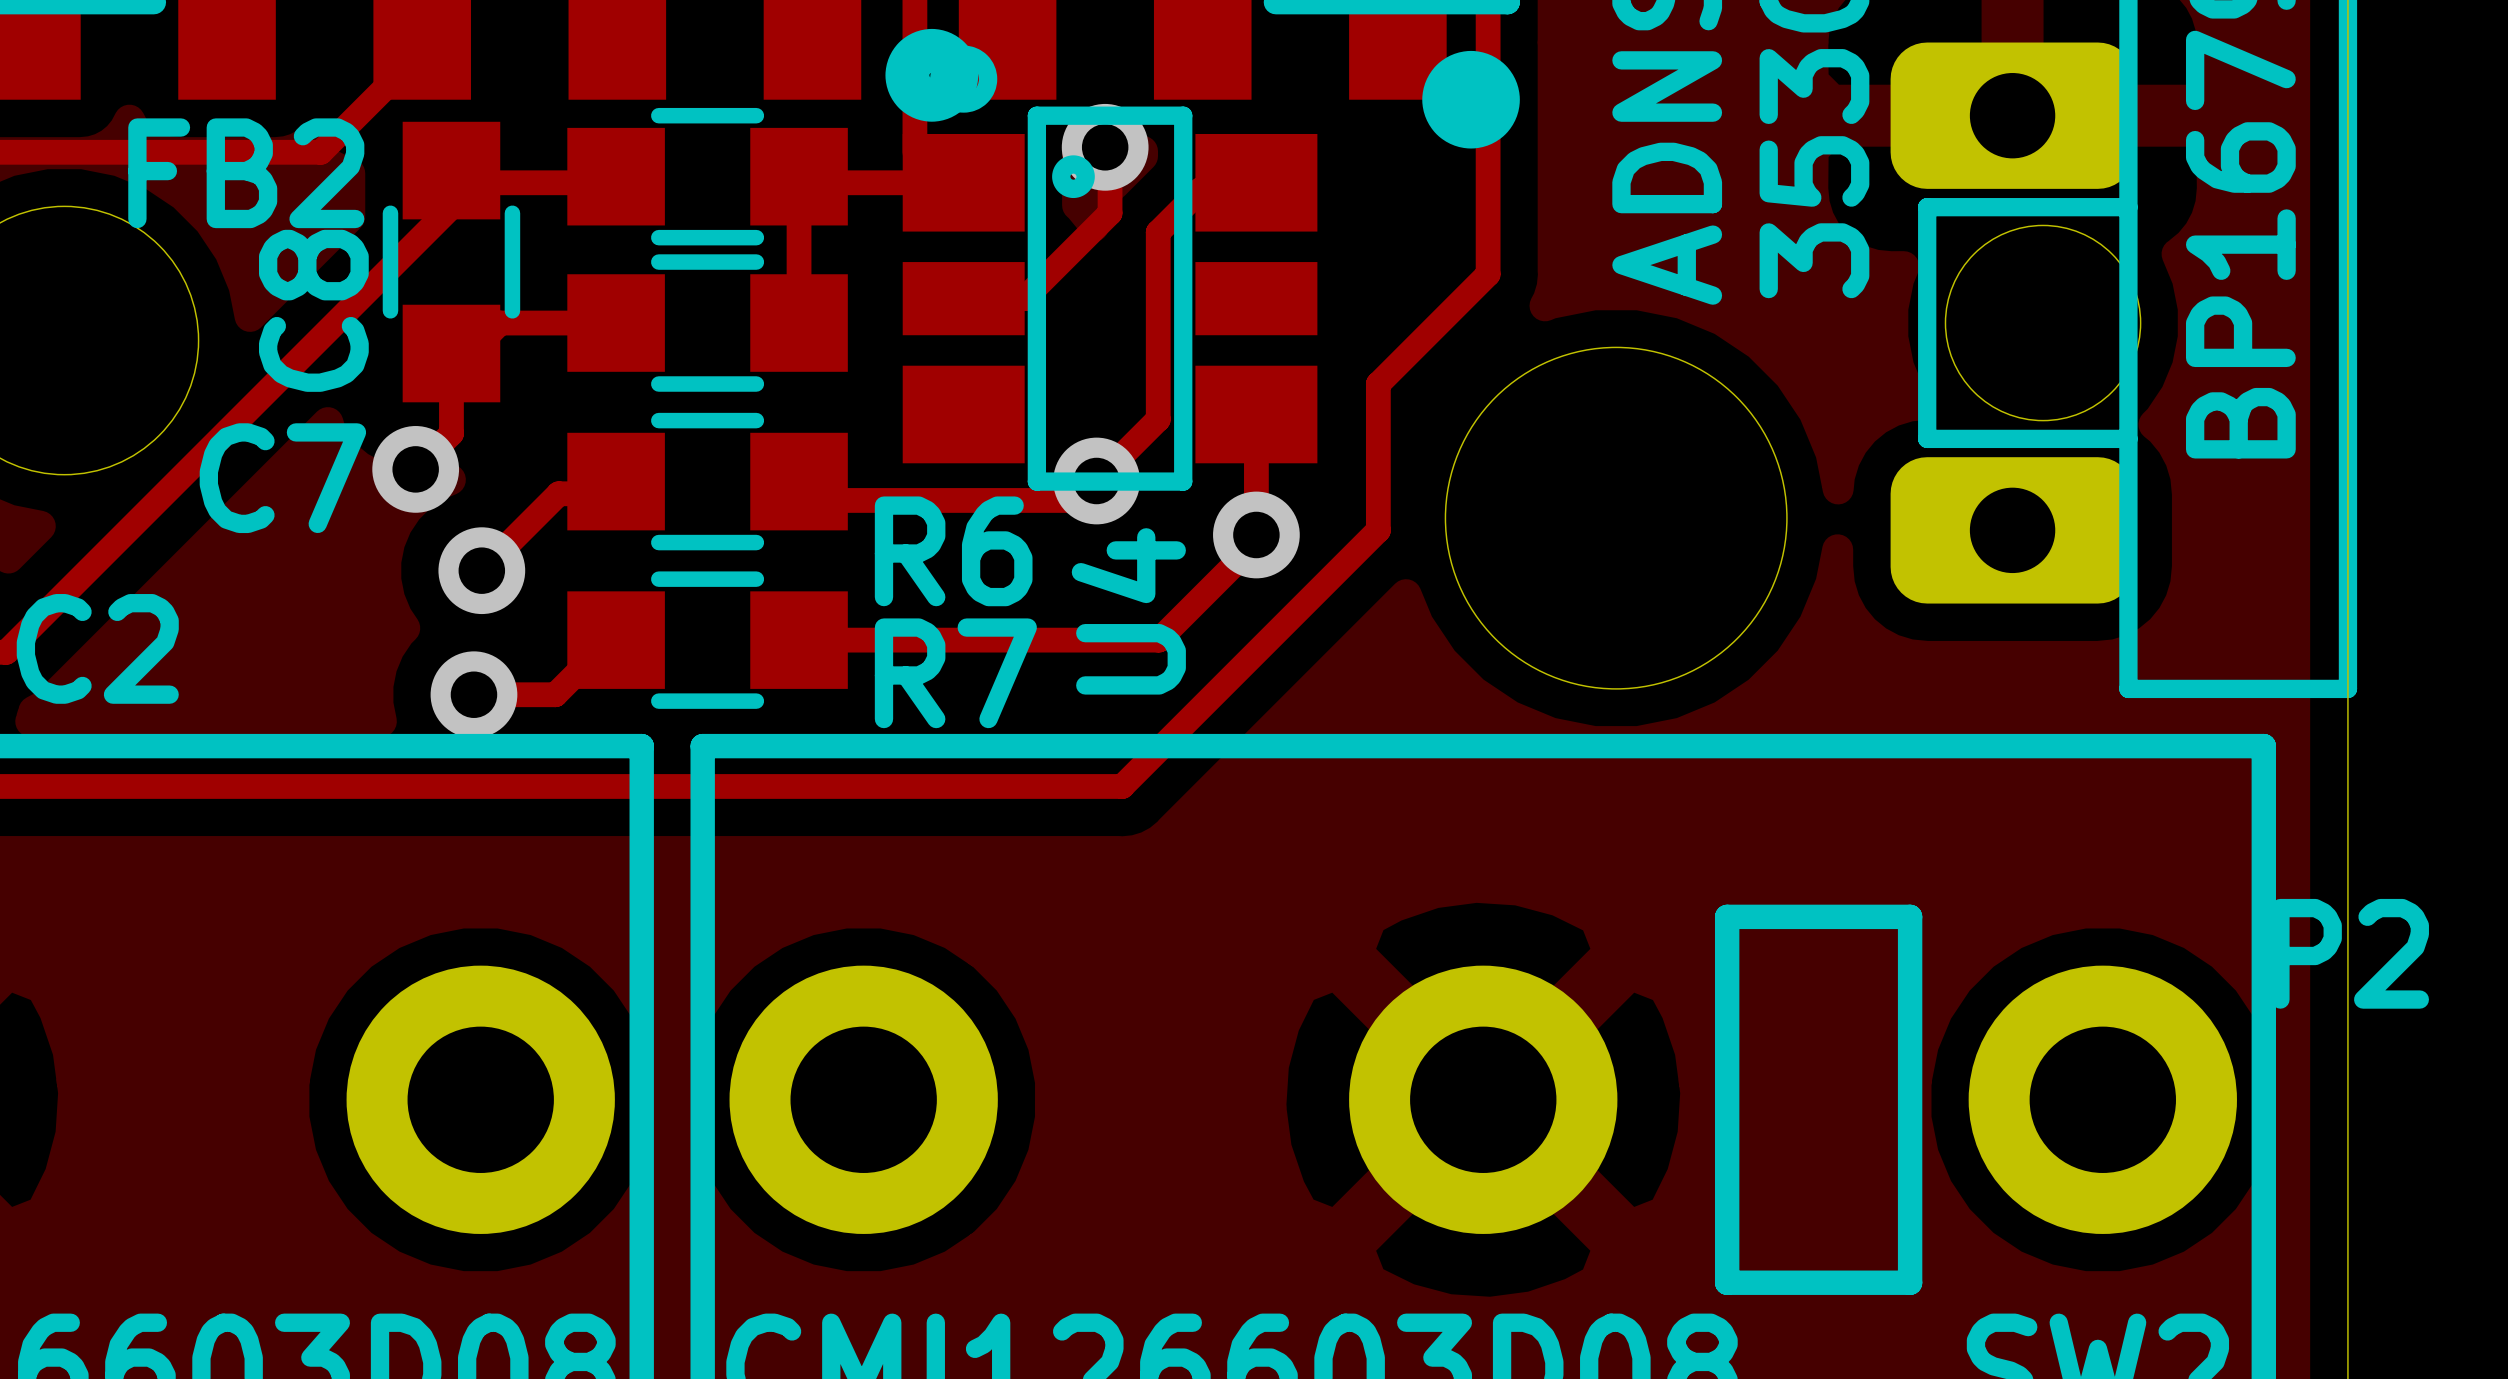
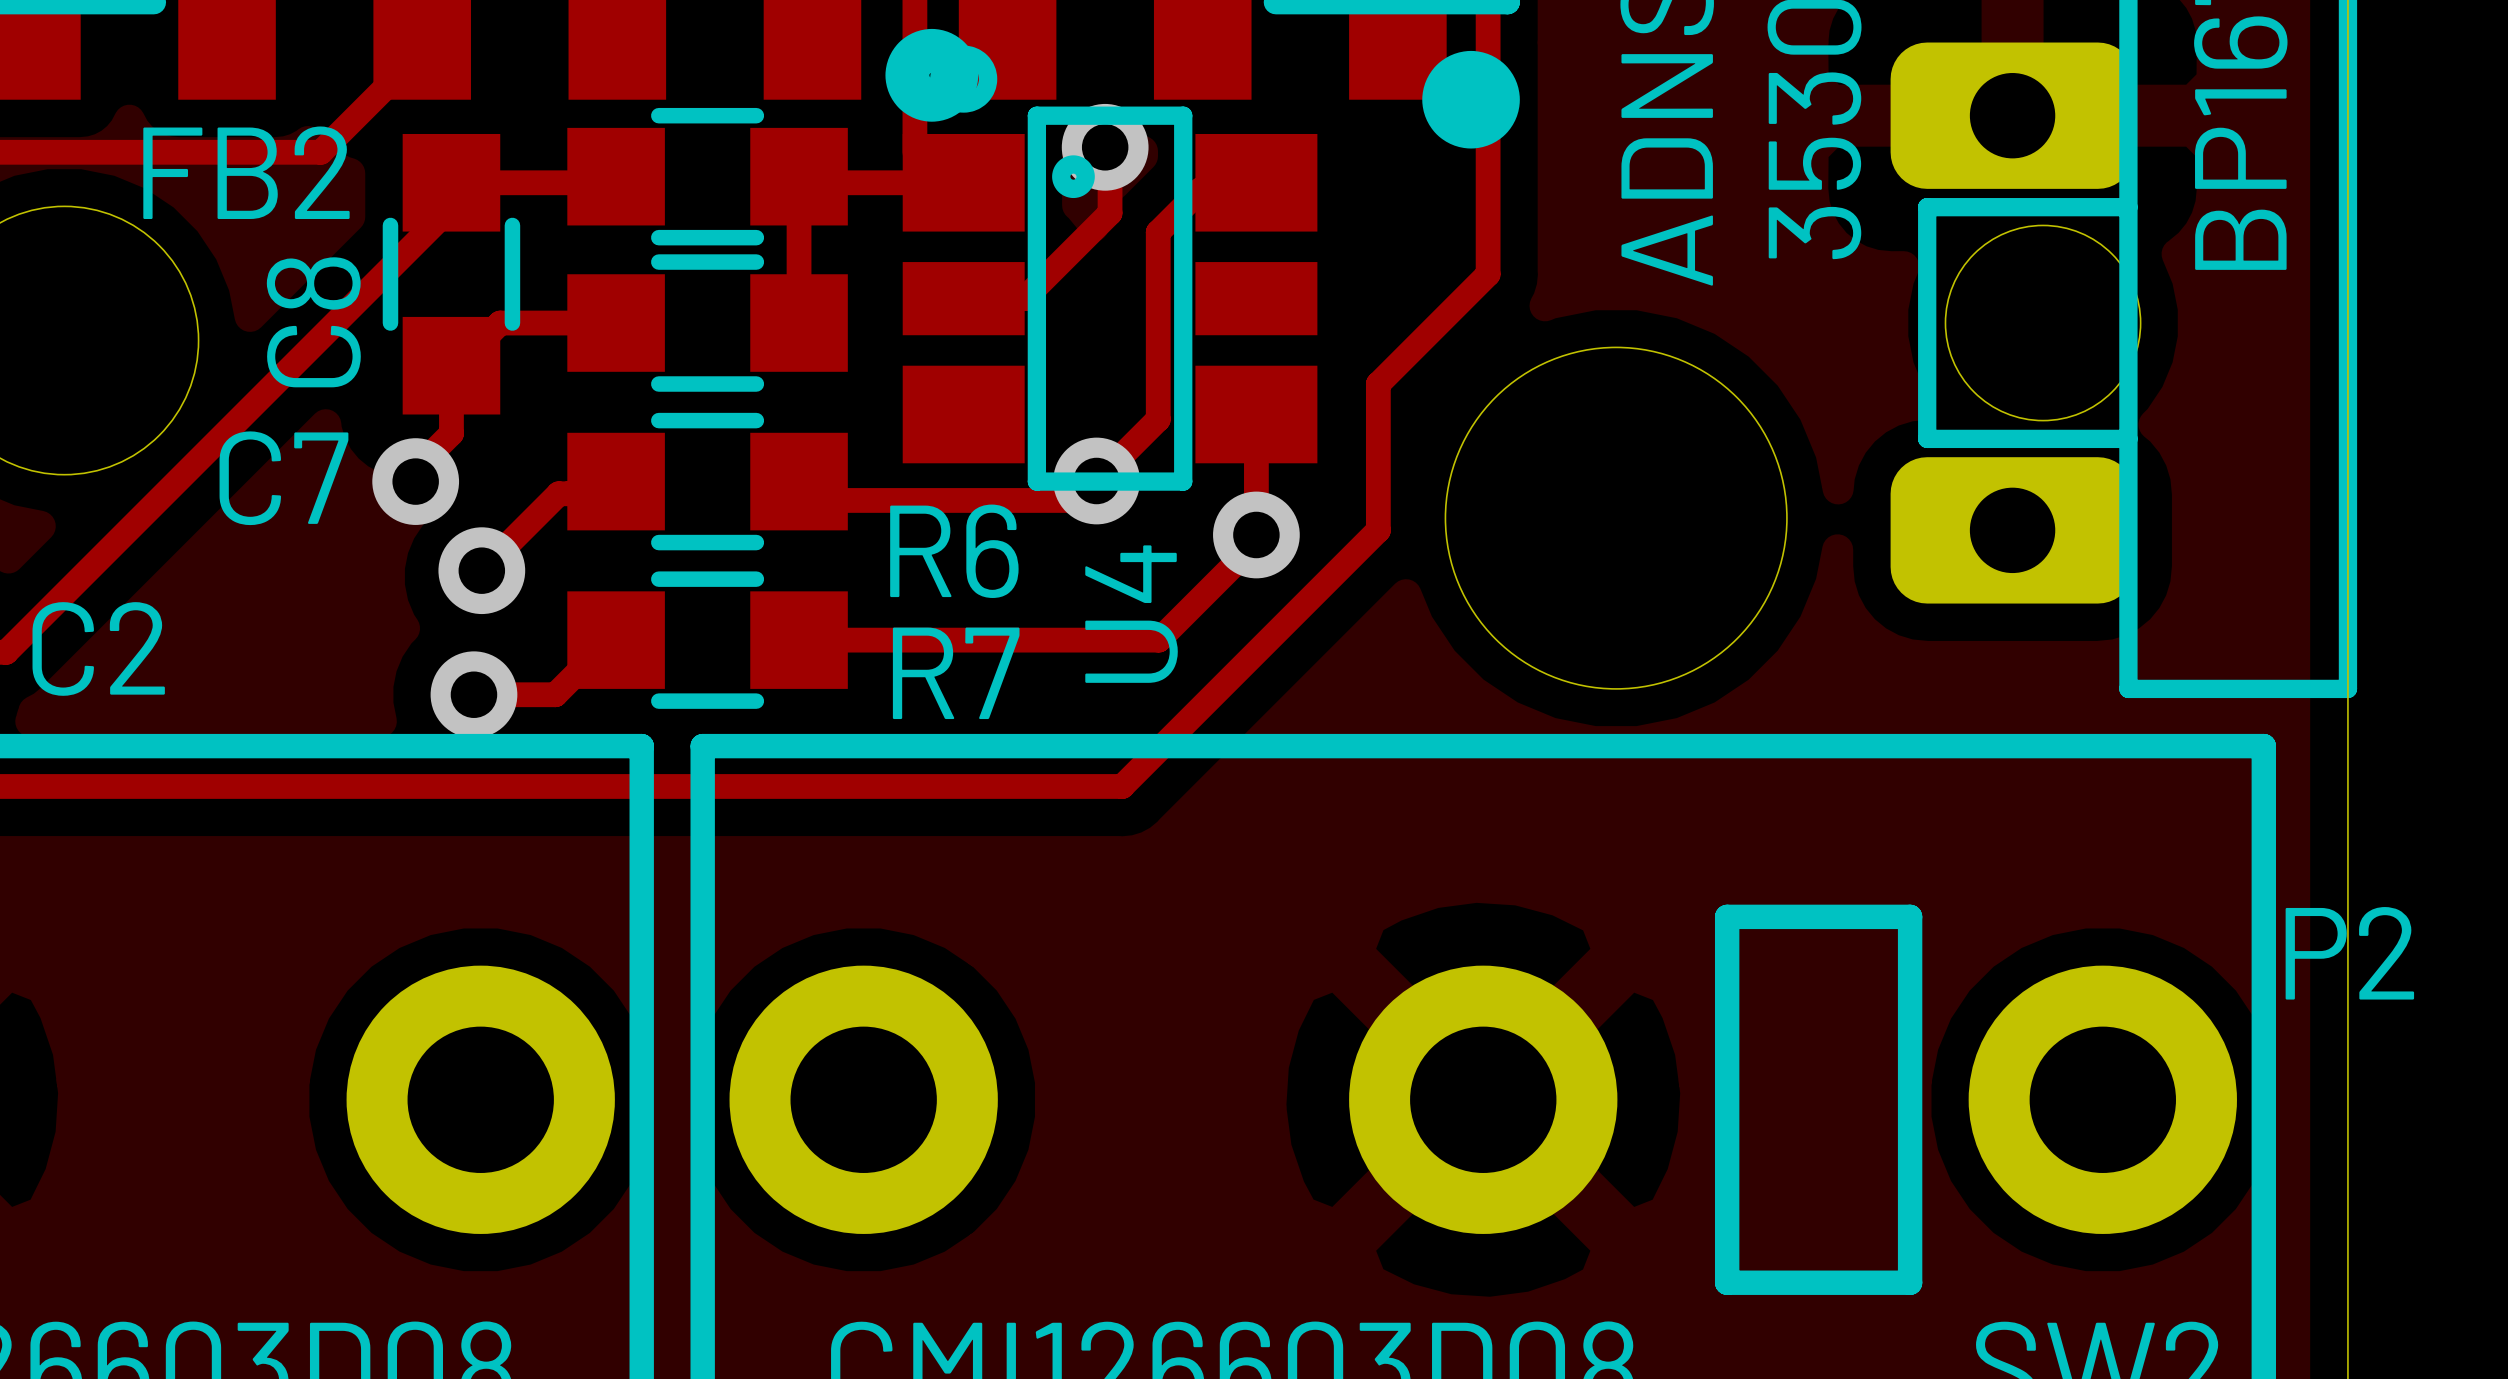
C8 position: (451, 262) -> (451, 274)
via position: (415, 469) -> (415, 481)

